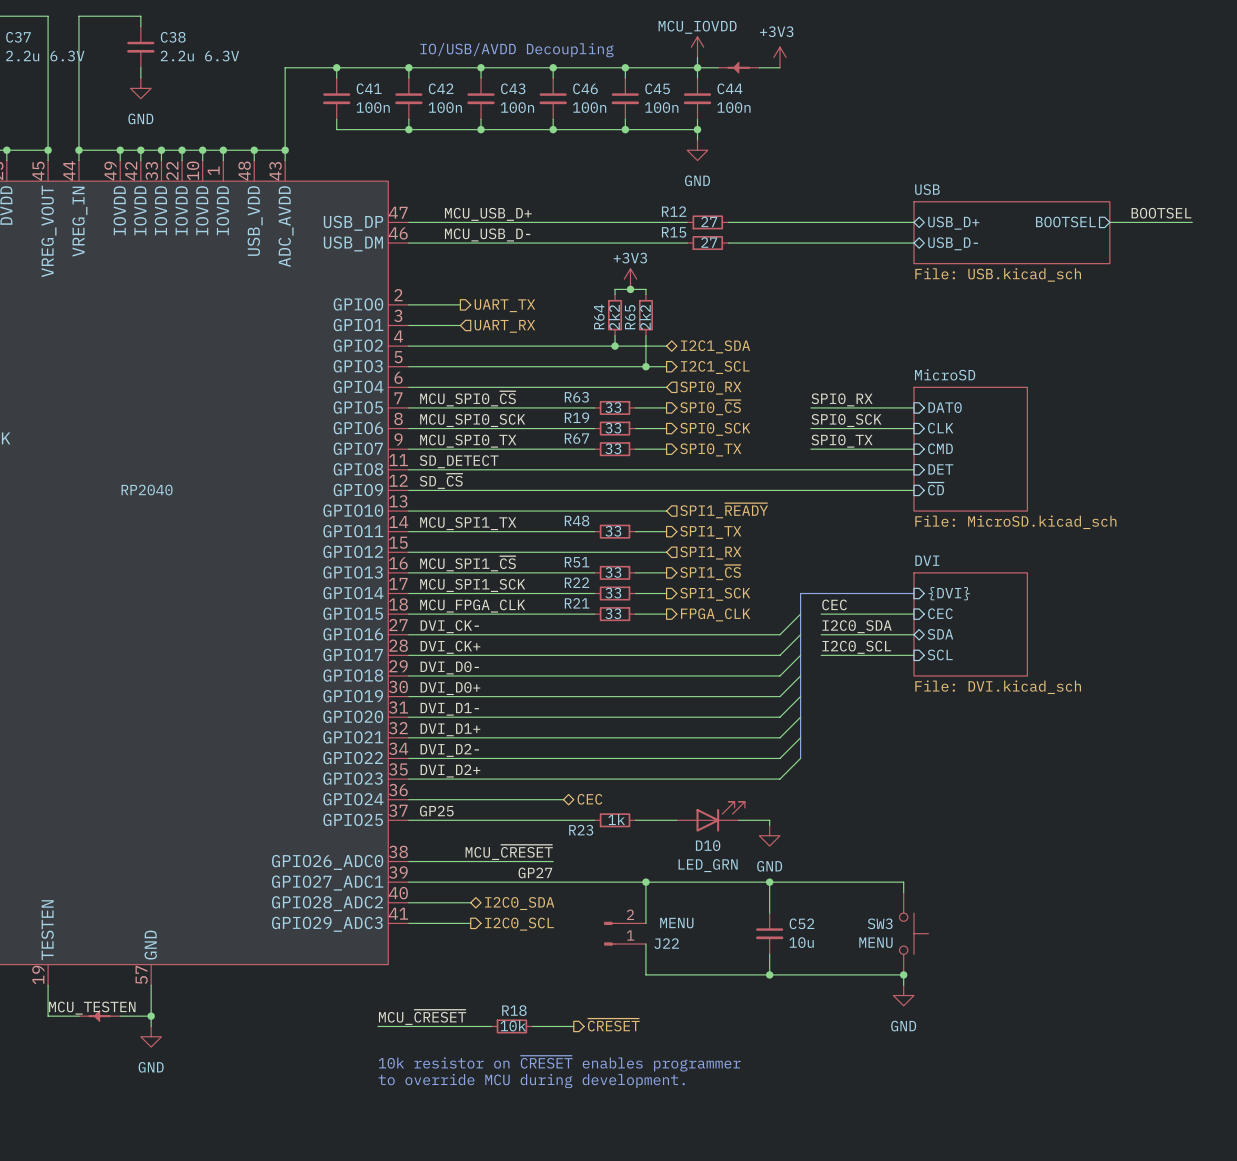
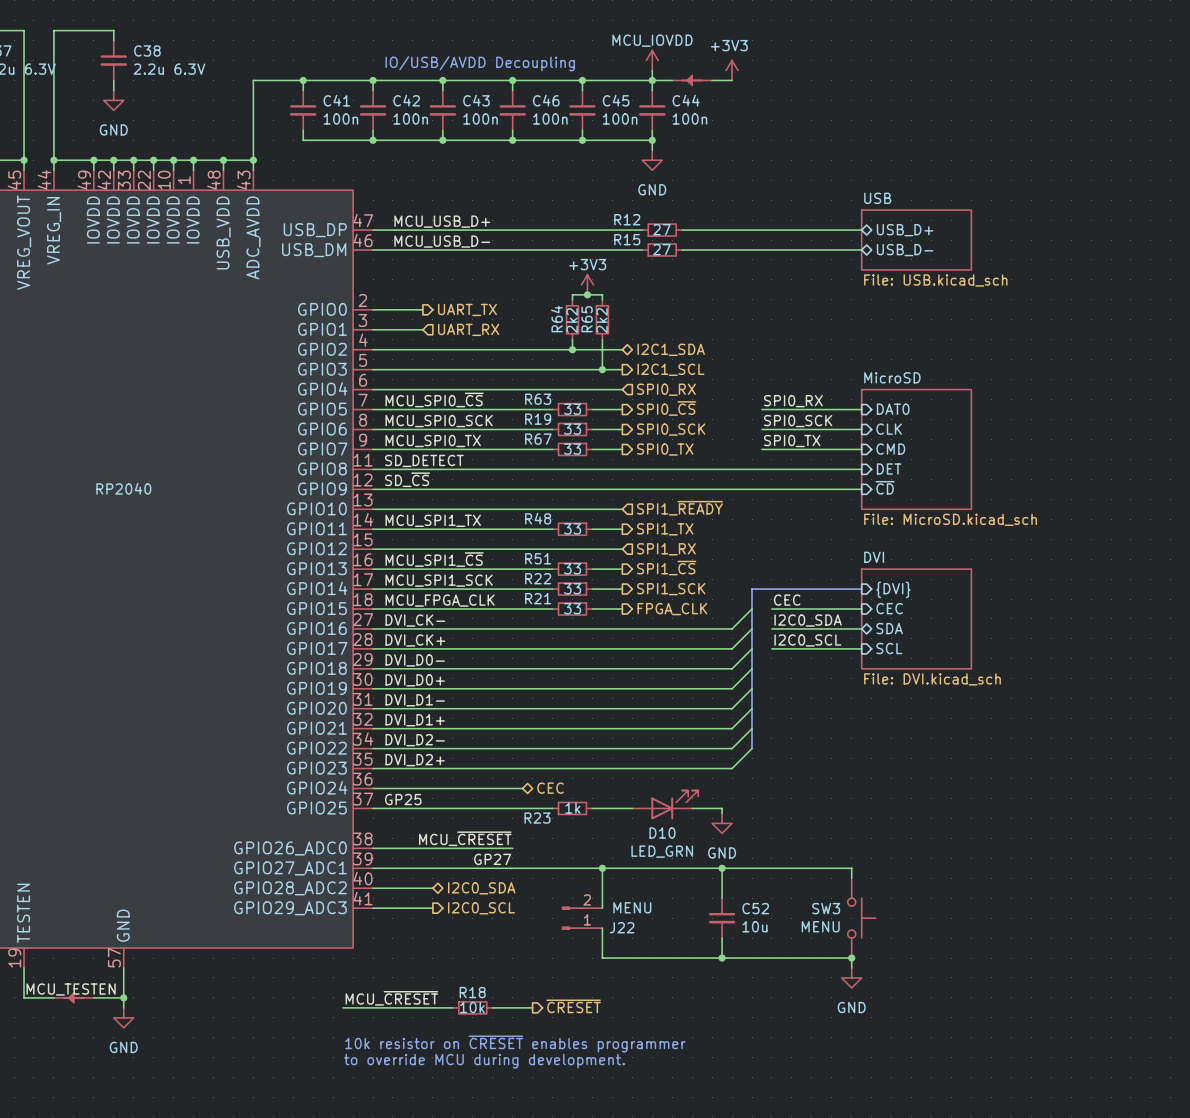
label: BOOTSEL (1161, 213) -> none
sheet pin: BOOTSEL (1065, 222) -> none
wire: (1109, 222) (1192, 222) -> none
sheet USB: none -> File: USB.kicad_sch (916, 240)
sheet USB: File: USB.kicad_sch (1011, 232) -> none

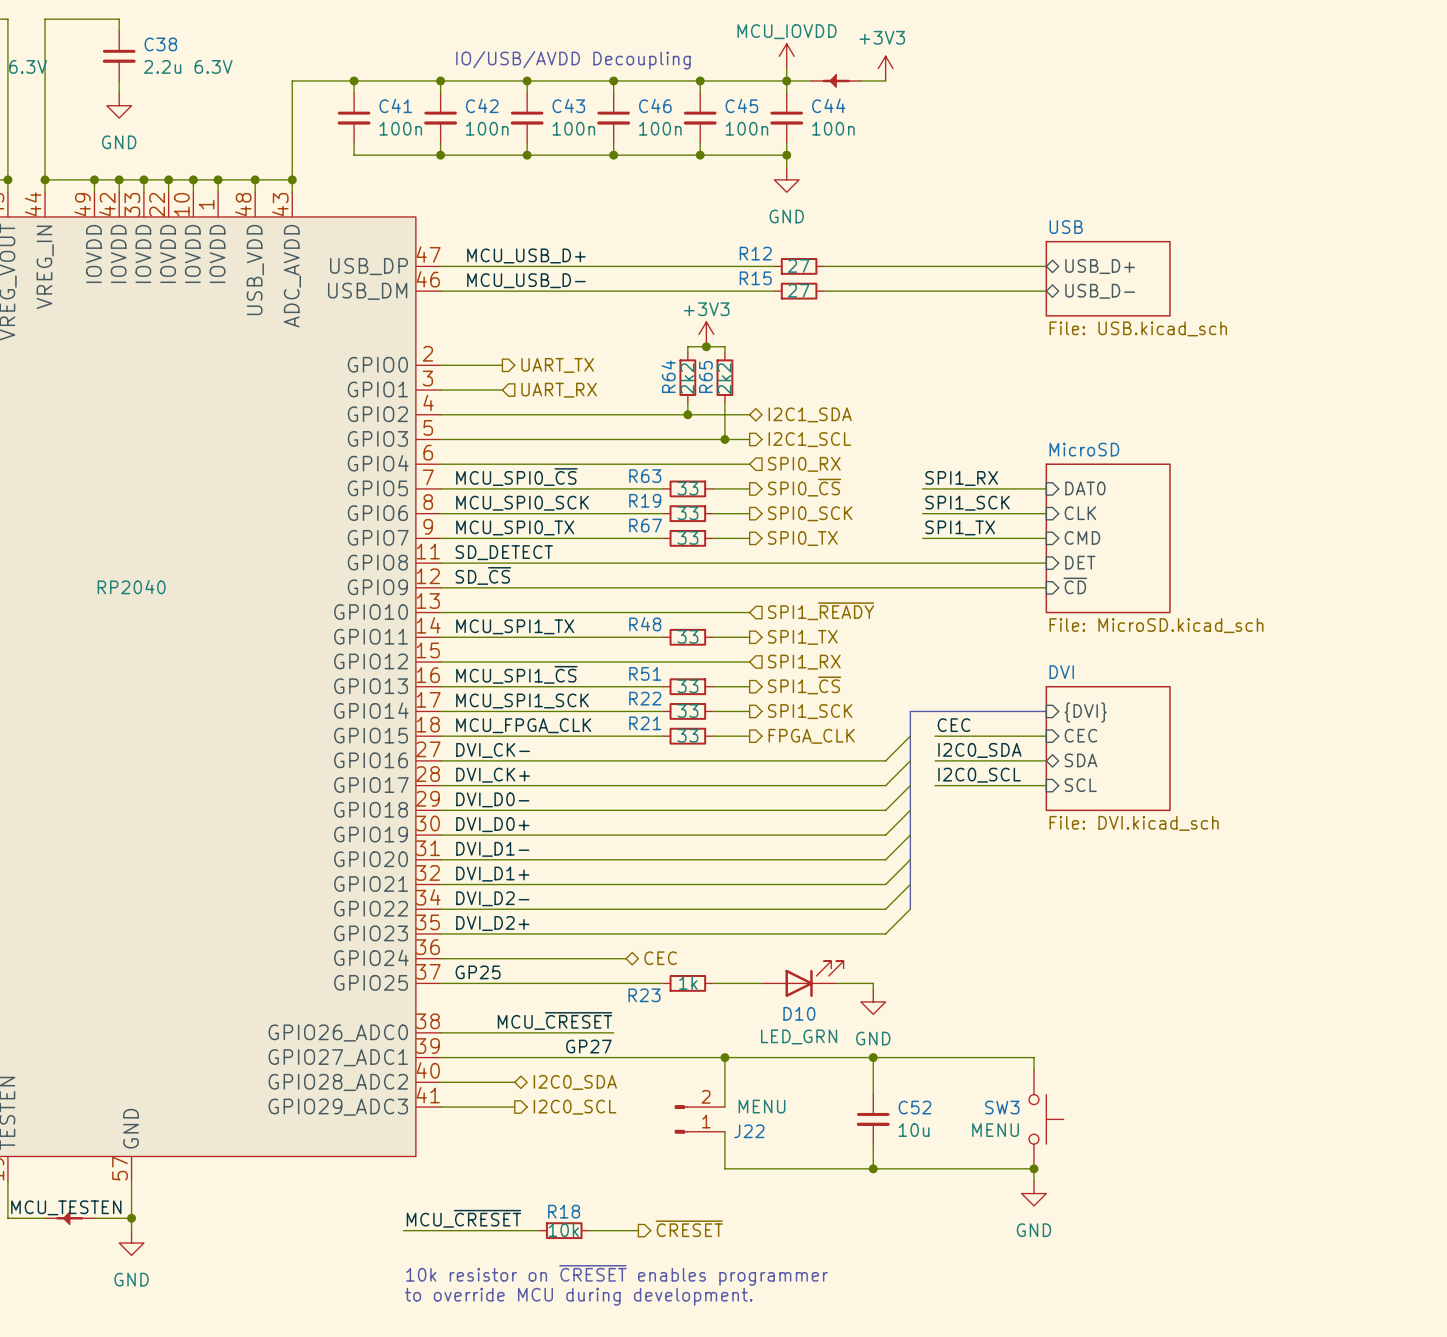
sheet USB shape: [861, 209, 972, 271] -> [1045, 240, 1171, 317]
sheet MicroSD shape: [861, 389, 972, 510] -> [1045, 463, 1171, 614]
label: SPI0_RX (793, 401) -> SPI1_RX (961, 478)
label: SPI0_SCK (798, 421) -> SPI1_SCK (967, 503)
label: SPI0_TX (792, 441) -> SPI1_TX (960, 527)
sheet DVI shape: [861, 568, 972, 670] -> [1045, 685, 1171, 812]

